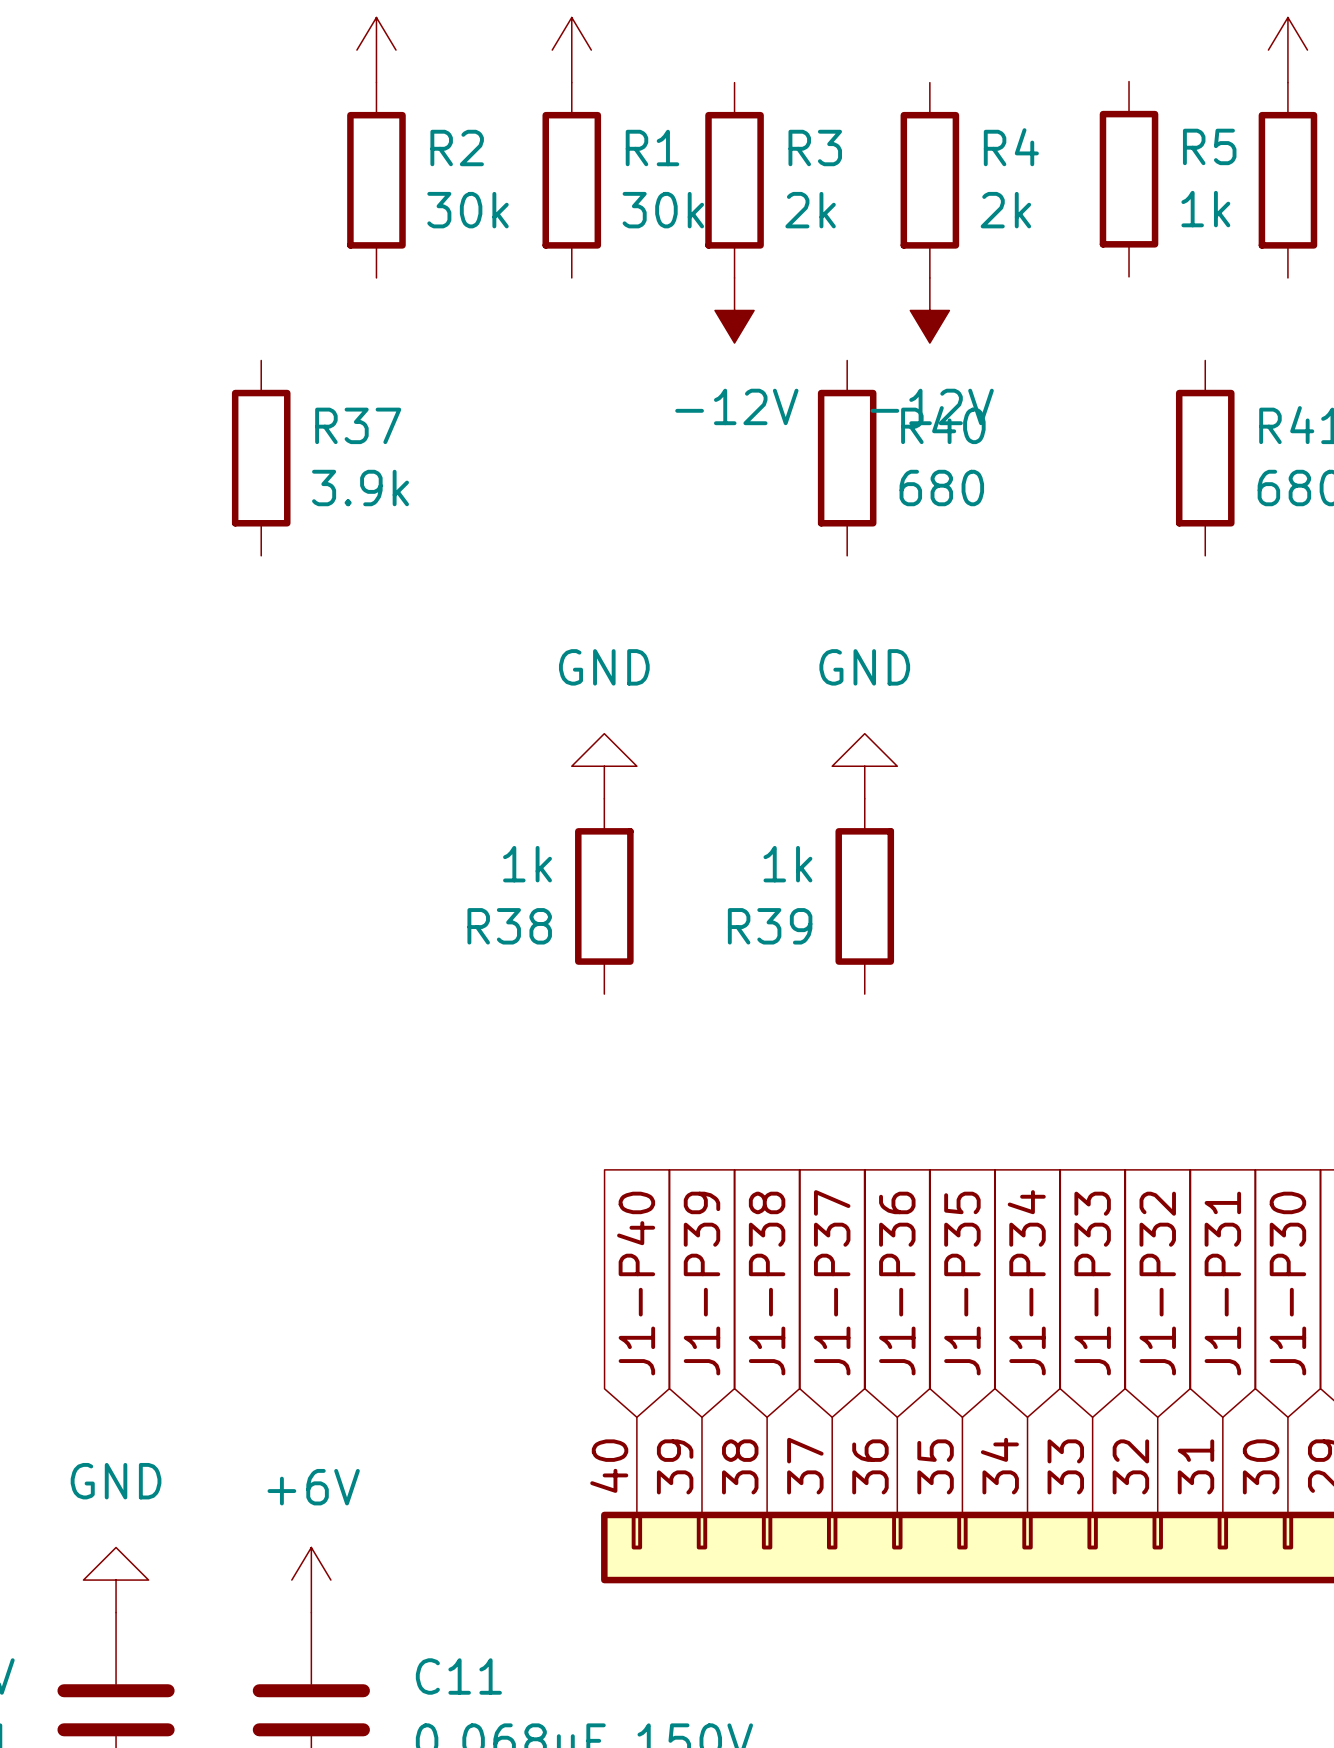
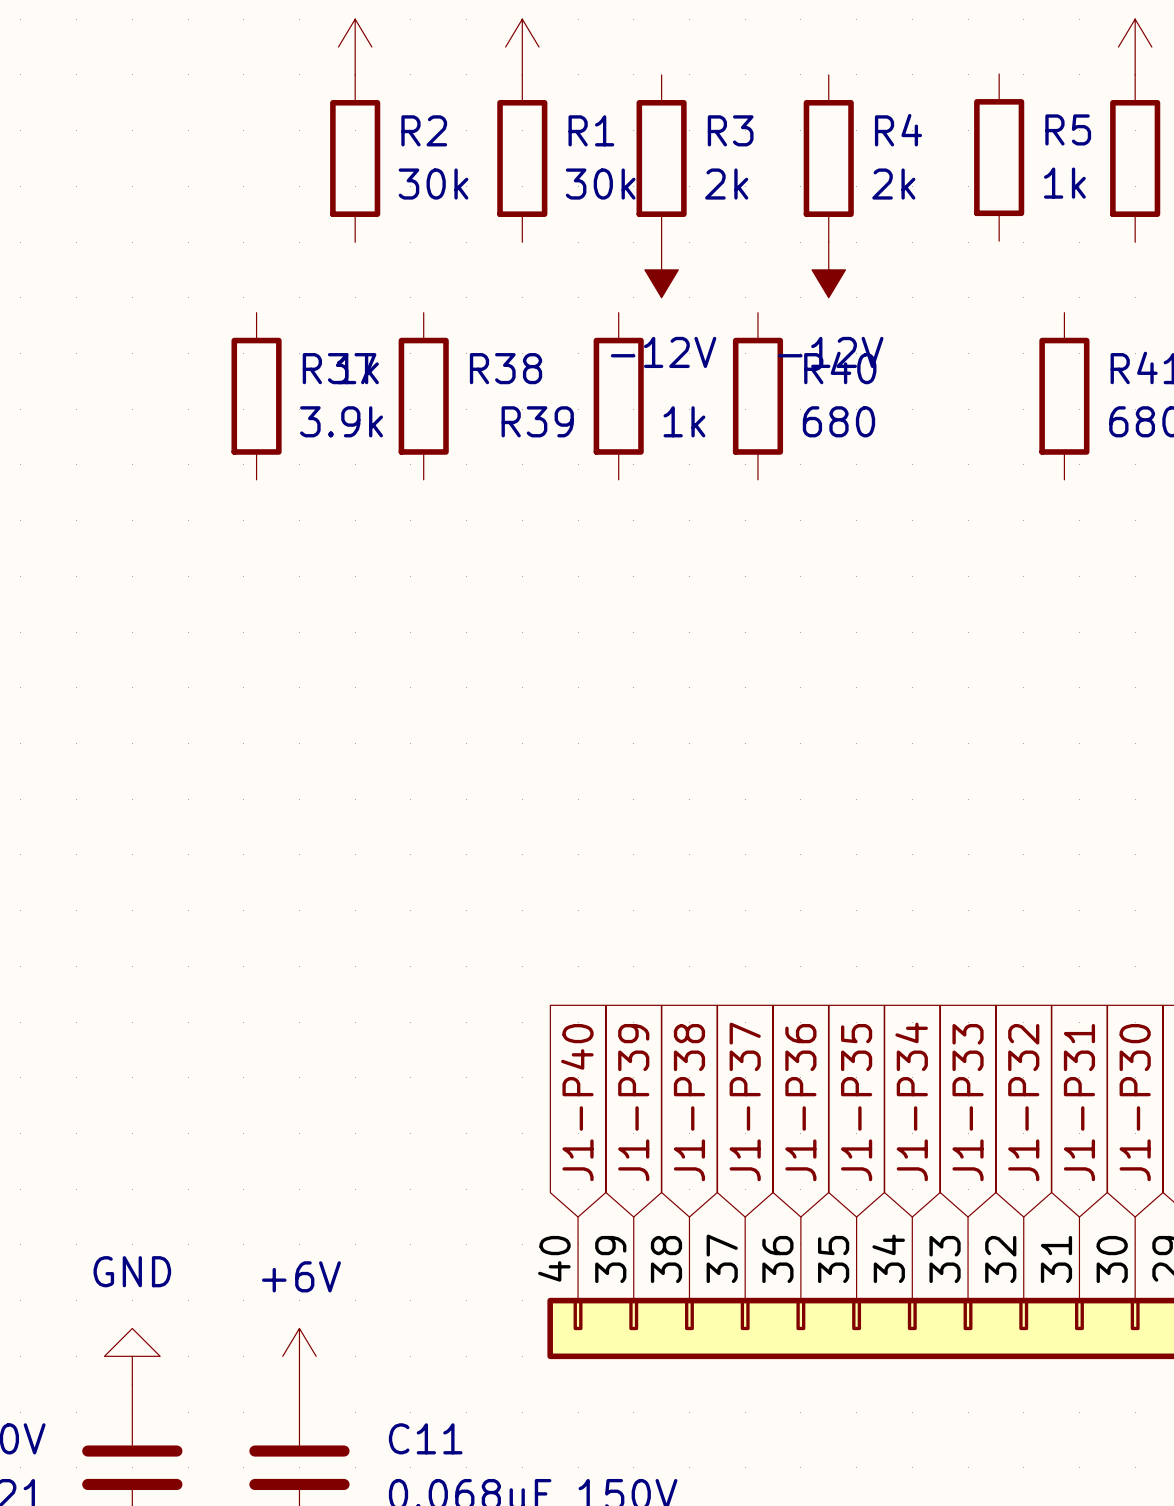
power symbol: GND (604, 766) -> none
power symbol: GND (864, 766) -> none
R39 value position: 1k (787, 864) -> 1k (684, 421)
R38 position: (604, 896) -> (423, 396)
R39 position: (864, 896) -> (618, 396)
R38 name position: R38 (509, 926) -> R38 (506, 368)

